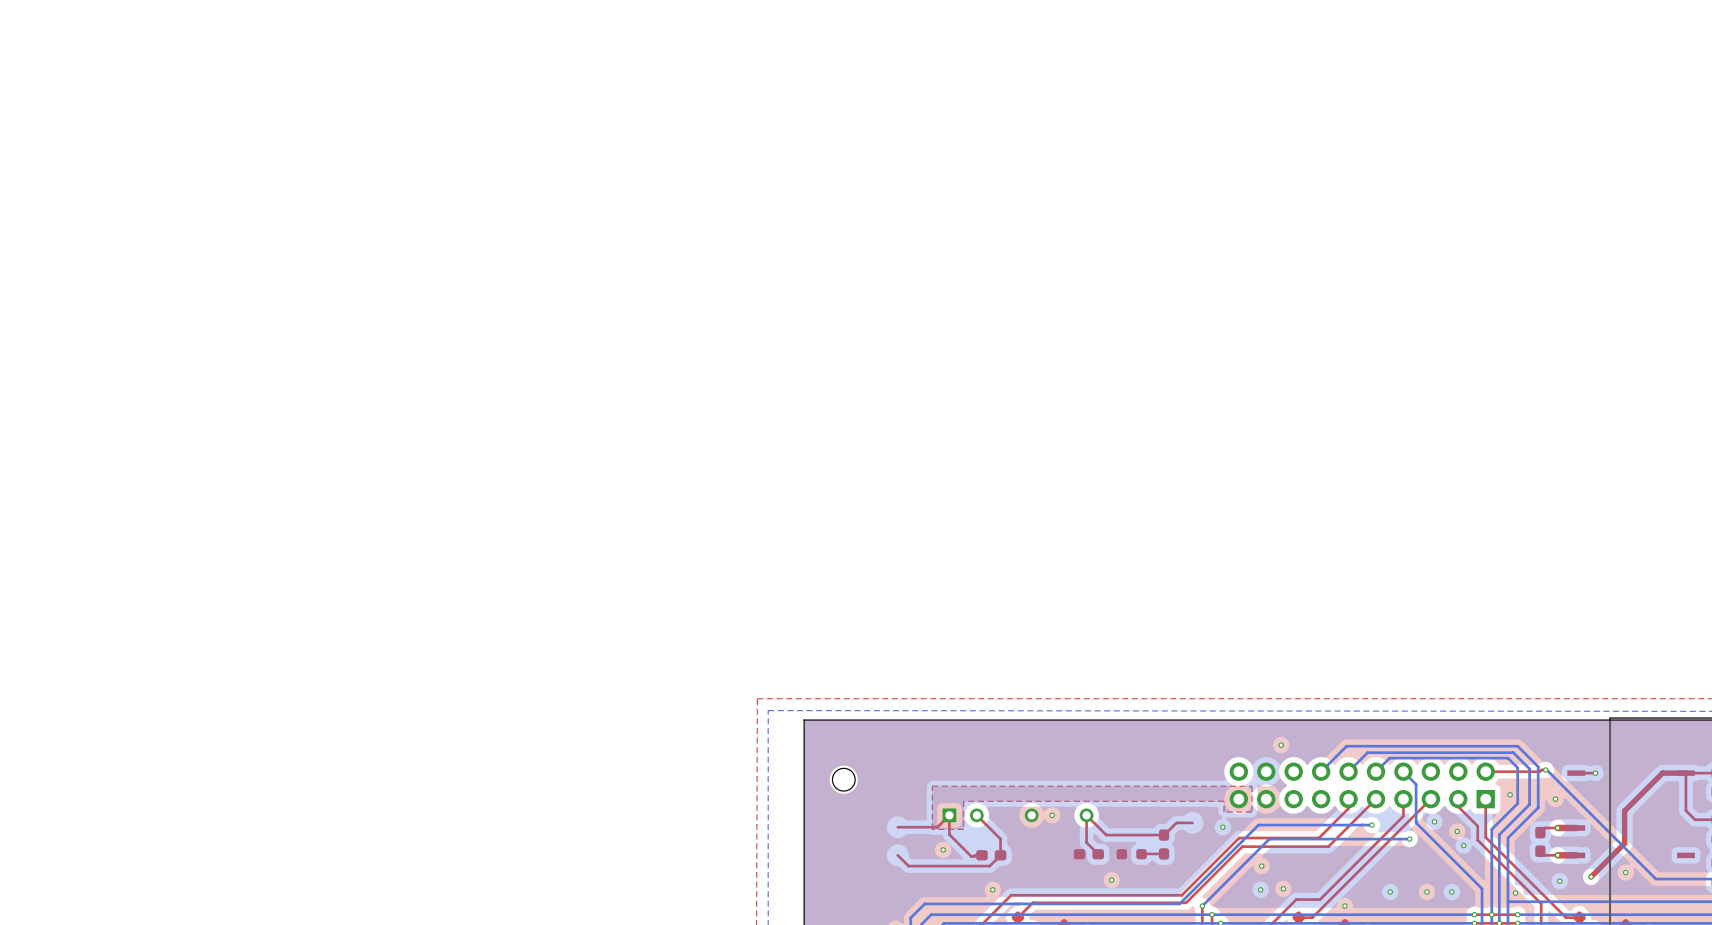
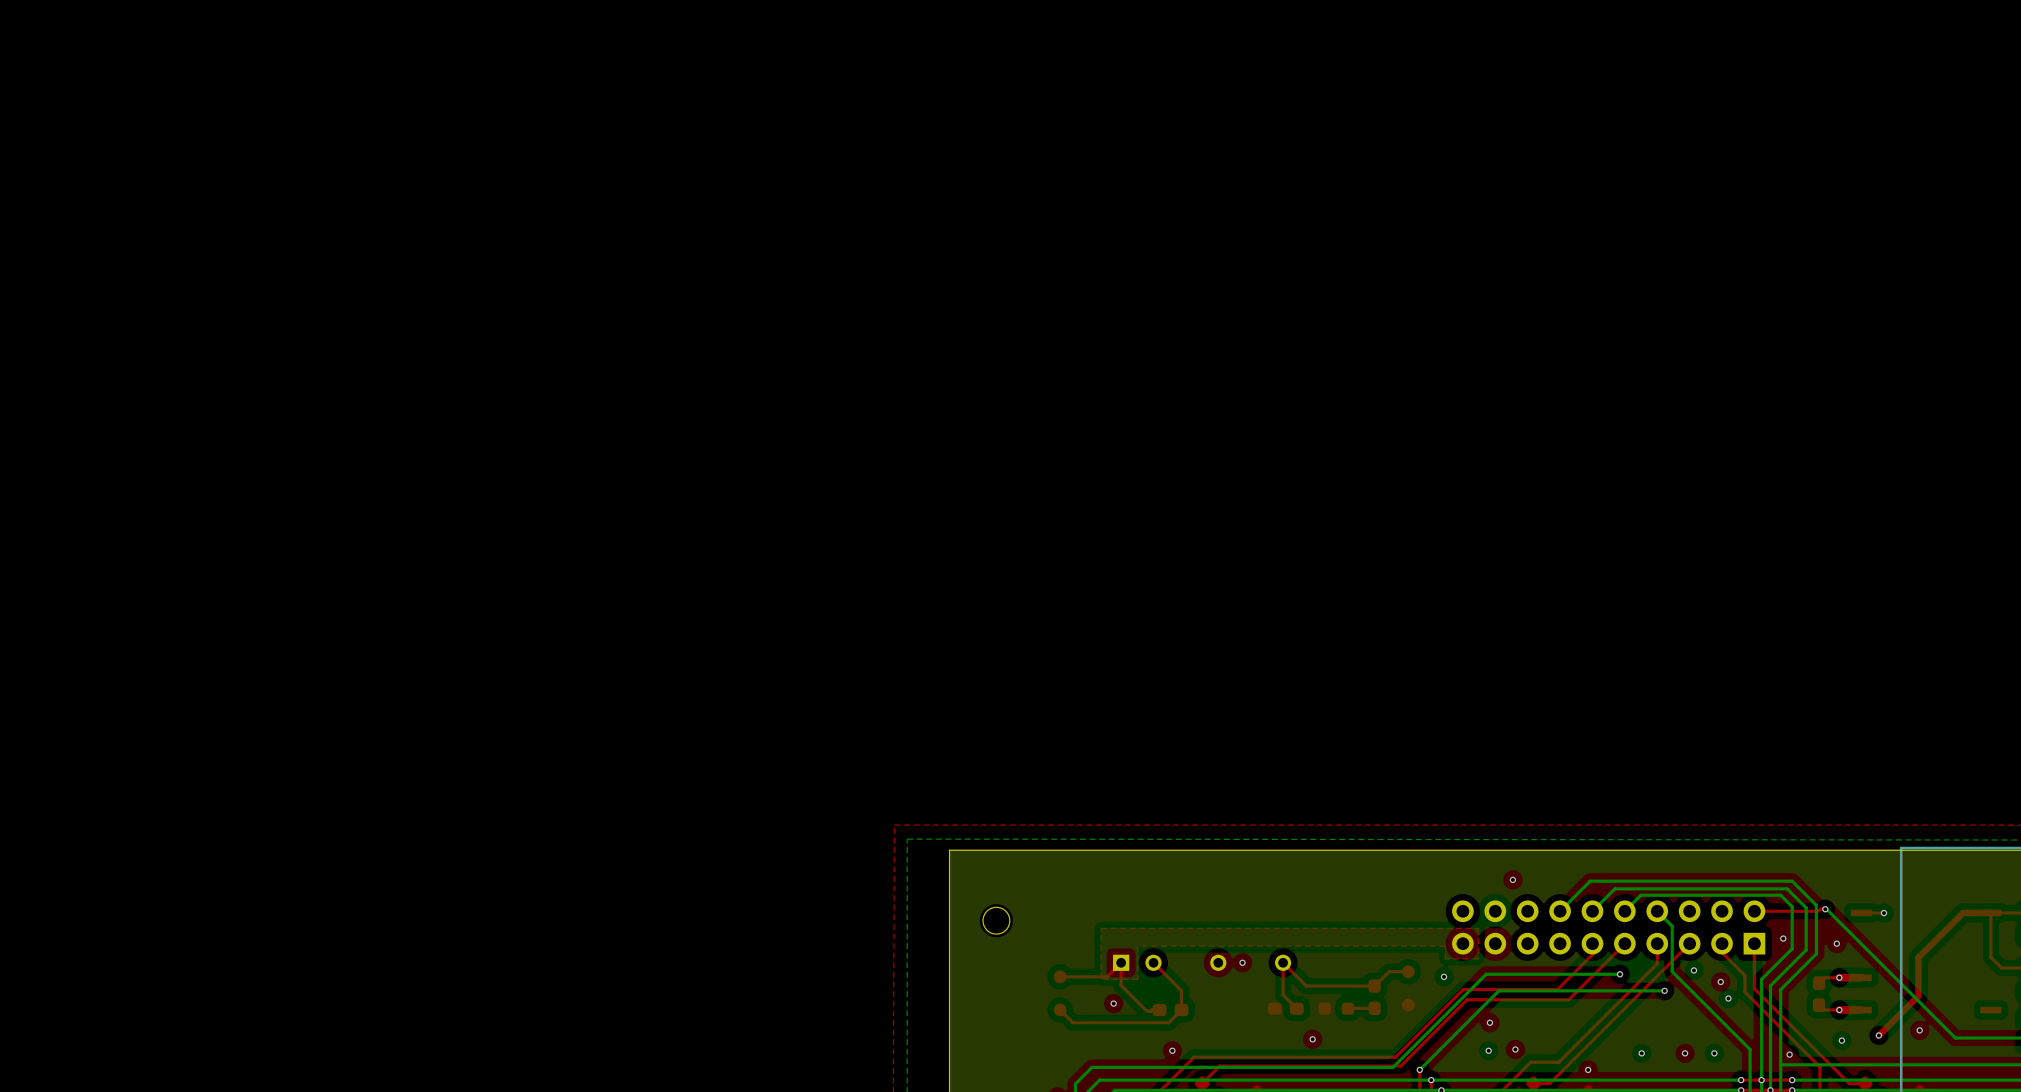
part: none -> (1408, 971)
part: none -> (1060, 976)
part: none -> (1408, 1004)
part: none -> (1060, 1009)

